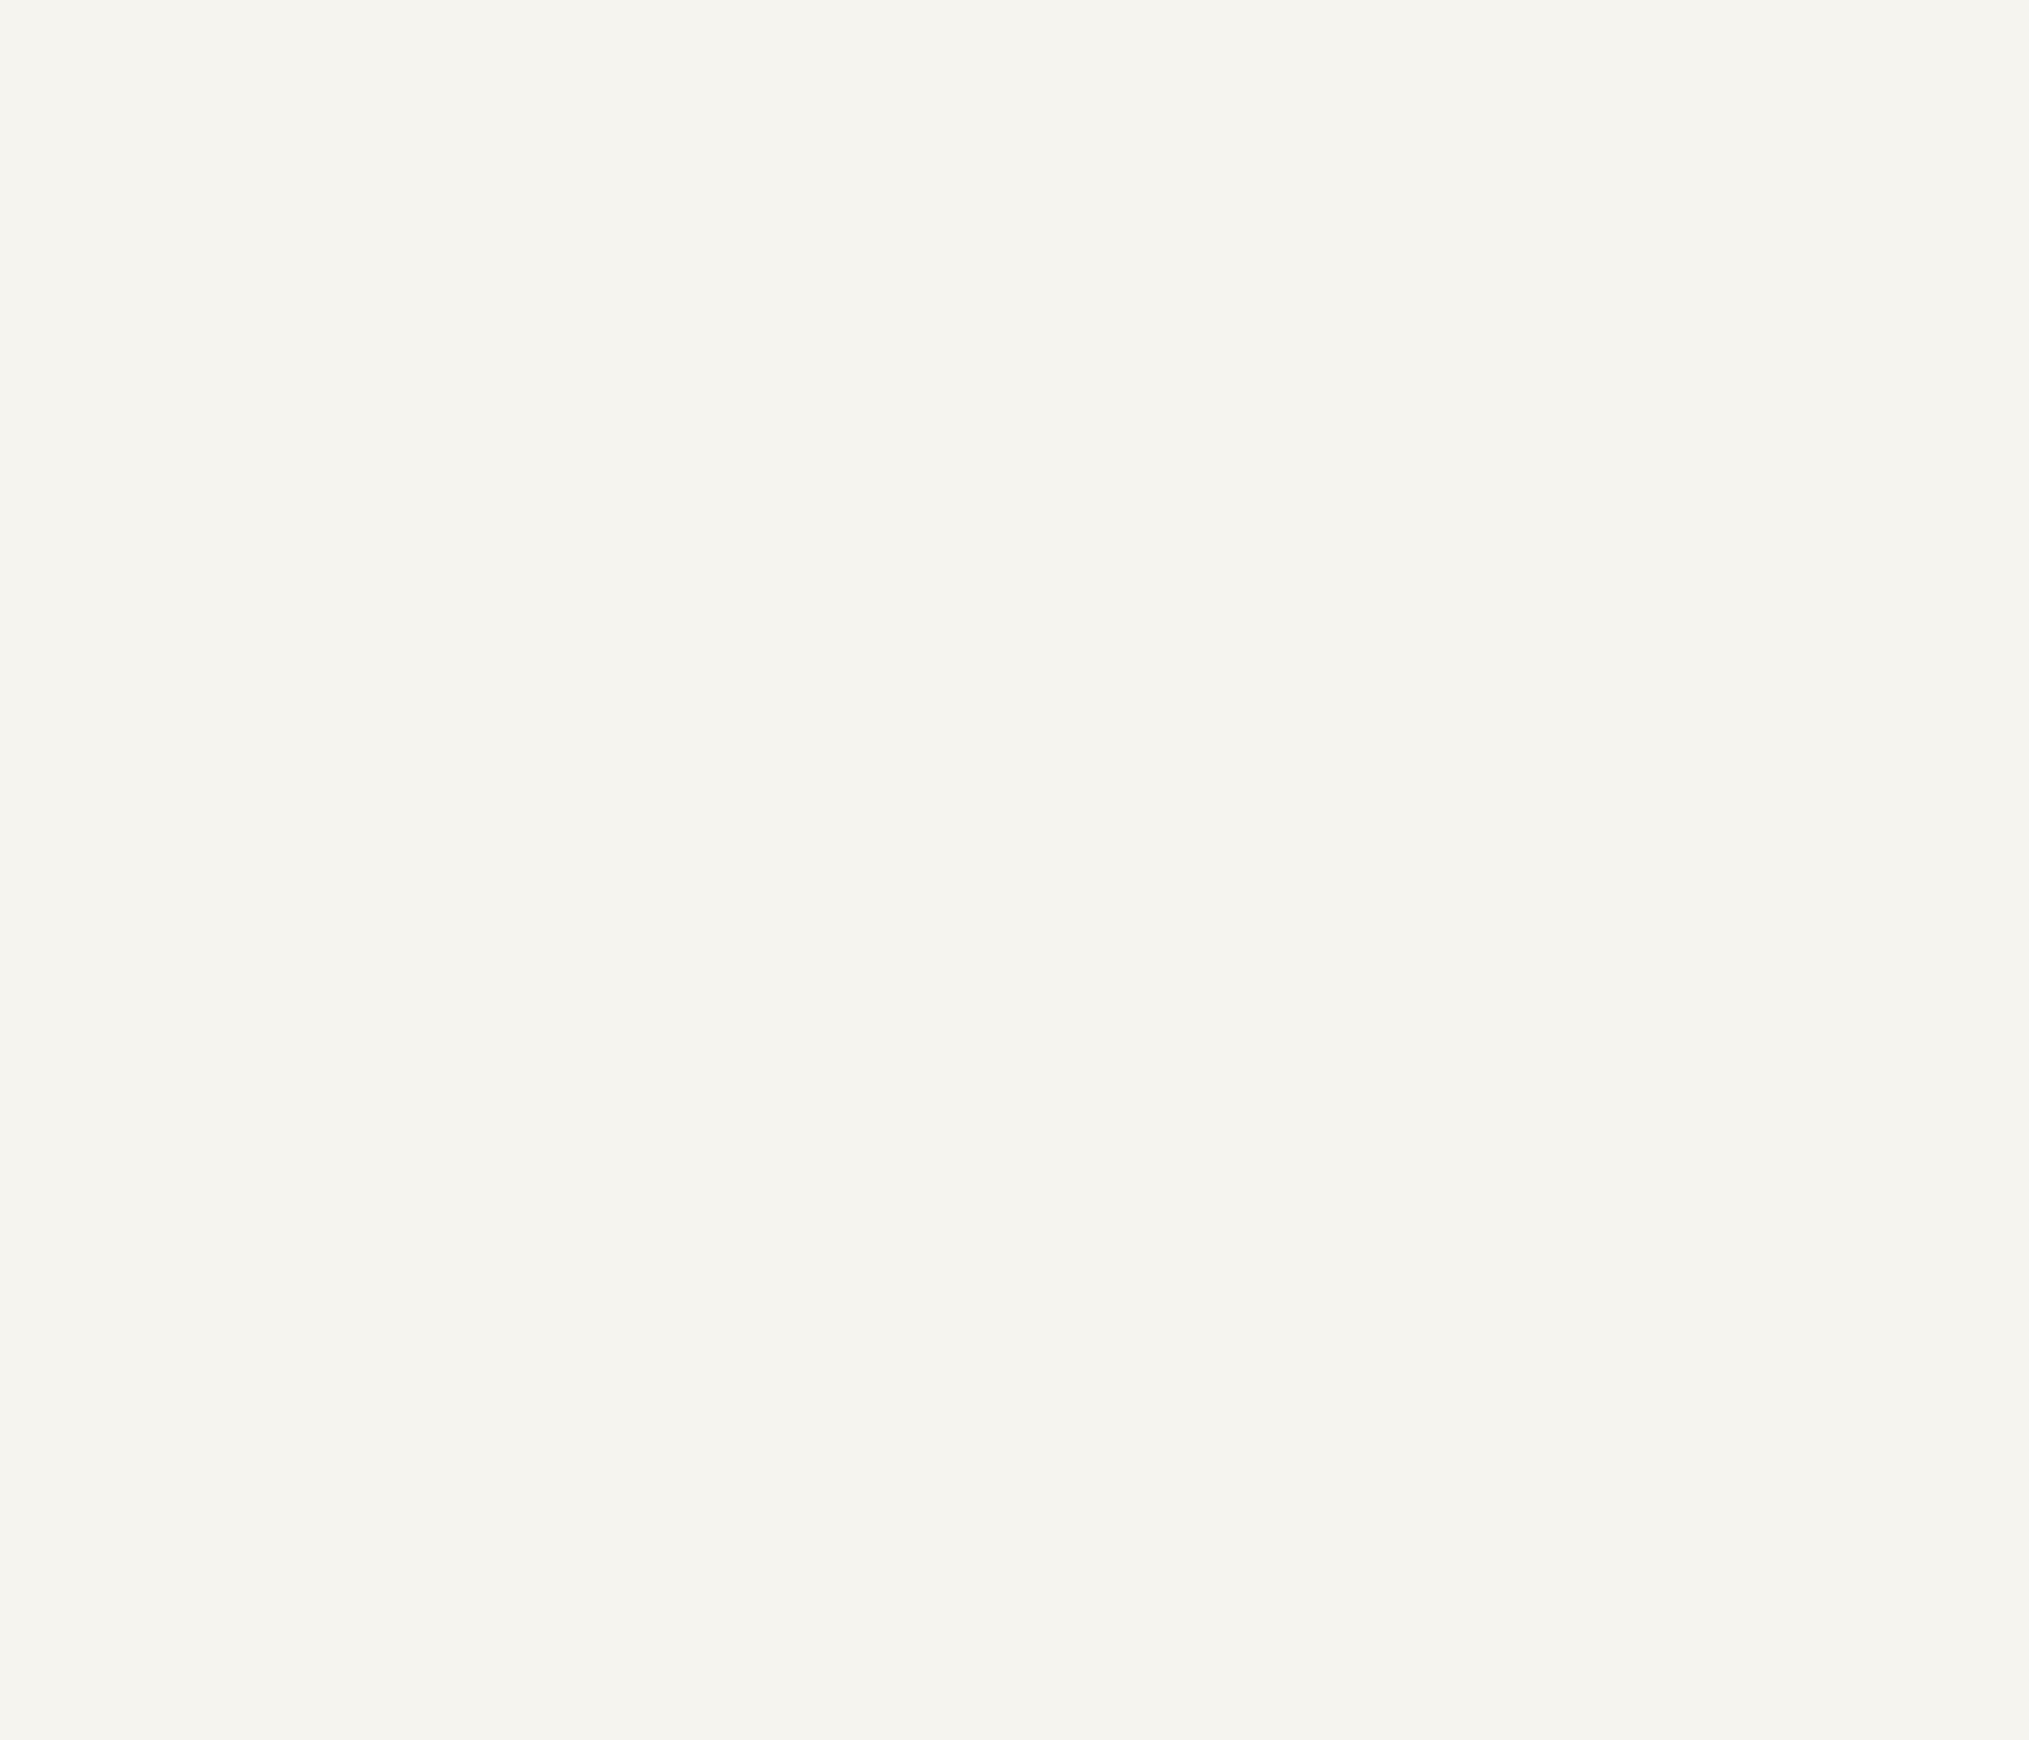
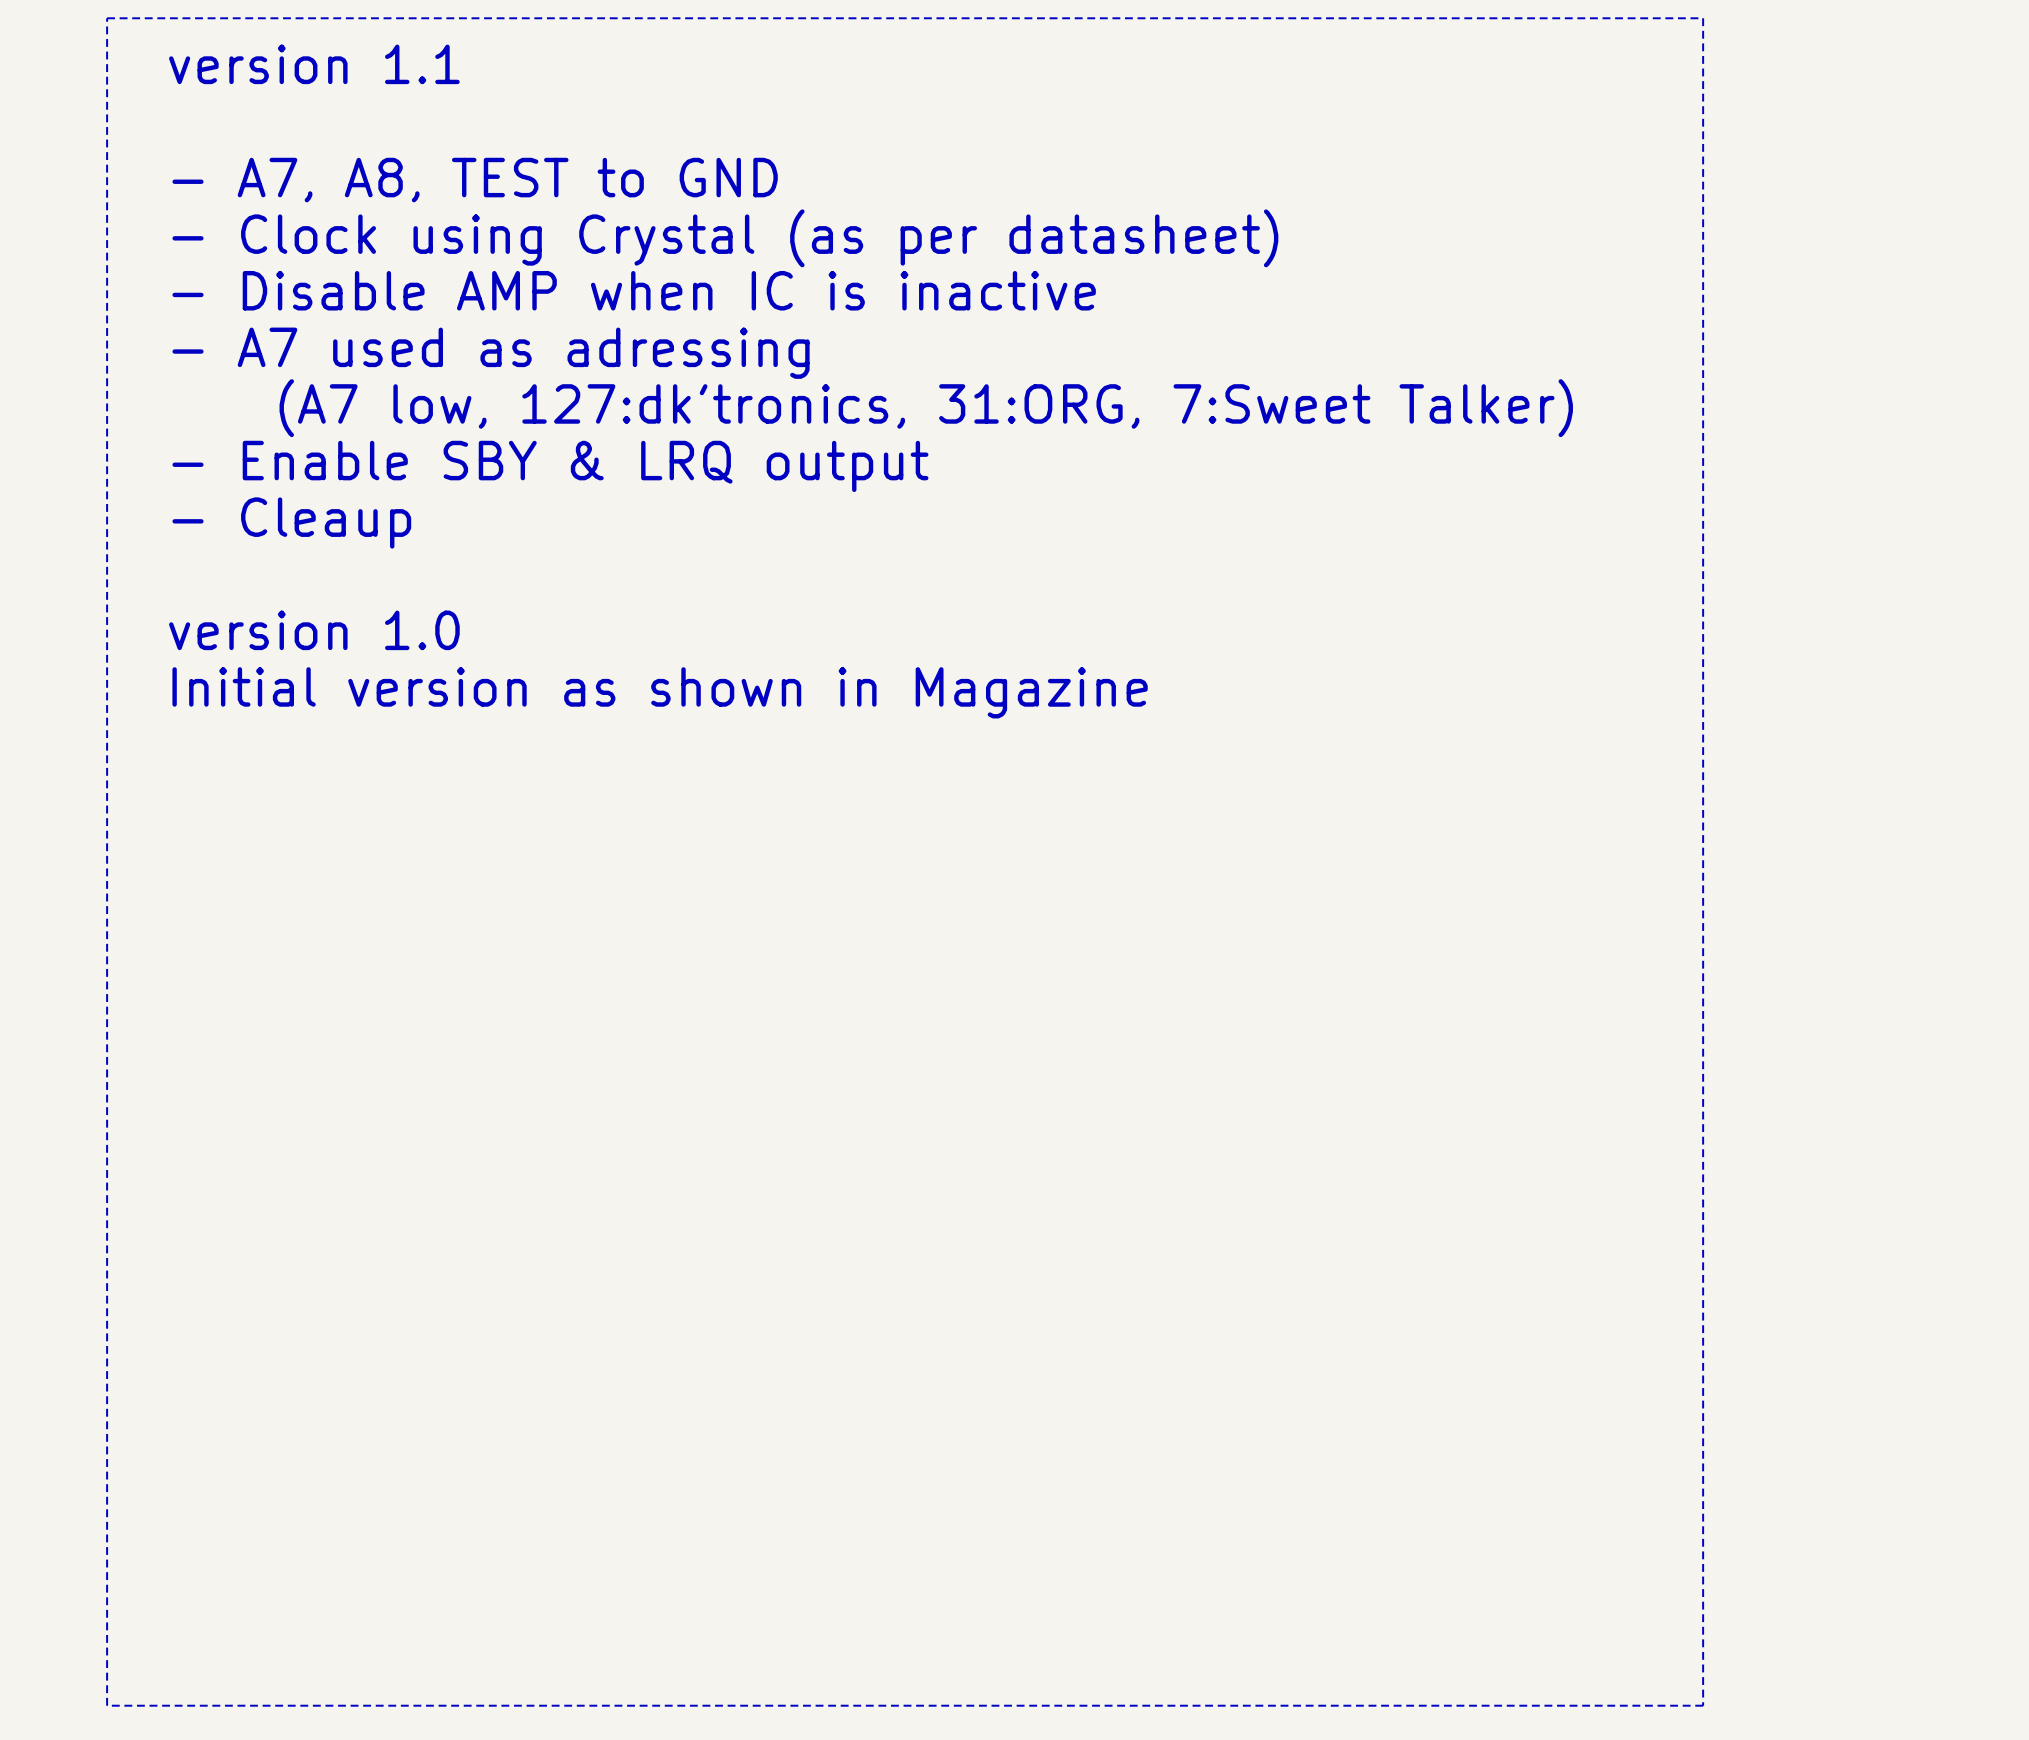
line: none -> (107, 18) (1703, 18) (1703, 1705) (107, 1705) (107, 18)
text: none -> version 1.1 (314, 64)
text: none -> - A7, A8, TEST to GND (475, 180)
text: none -> - Clock using Crystal (as per datasheet) (725, 238)
text: none -> - Disable AMP when IC is inactive (634, 290)
text: none -> - A7 used as adressing (491, 353)
text: none -> (A7 low, 127:dk'tronics, 31:ORG, 7:Sweet Talker) (926, 408)
text: none -> - Enable SBY & LRQ output (550, 466)
text: none -> - Cleaup (291, 523)
text: none -> version 1.0 (314, 630)
text: none -> Initial version as shown in Magazine (660, 692)

